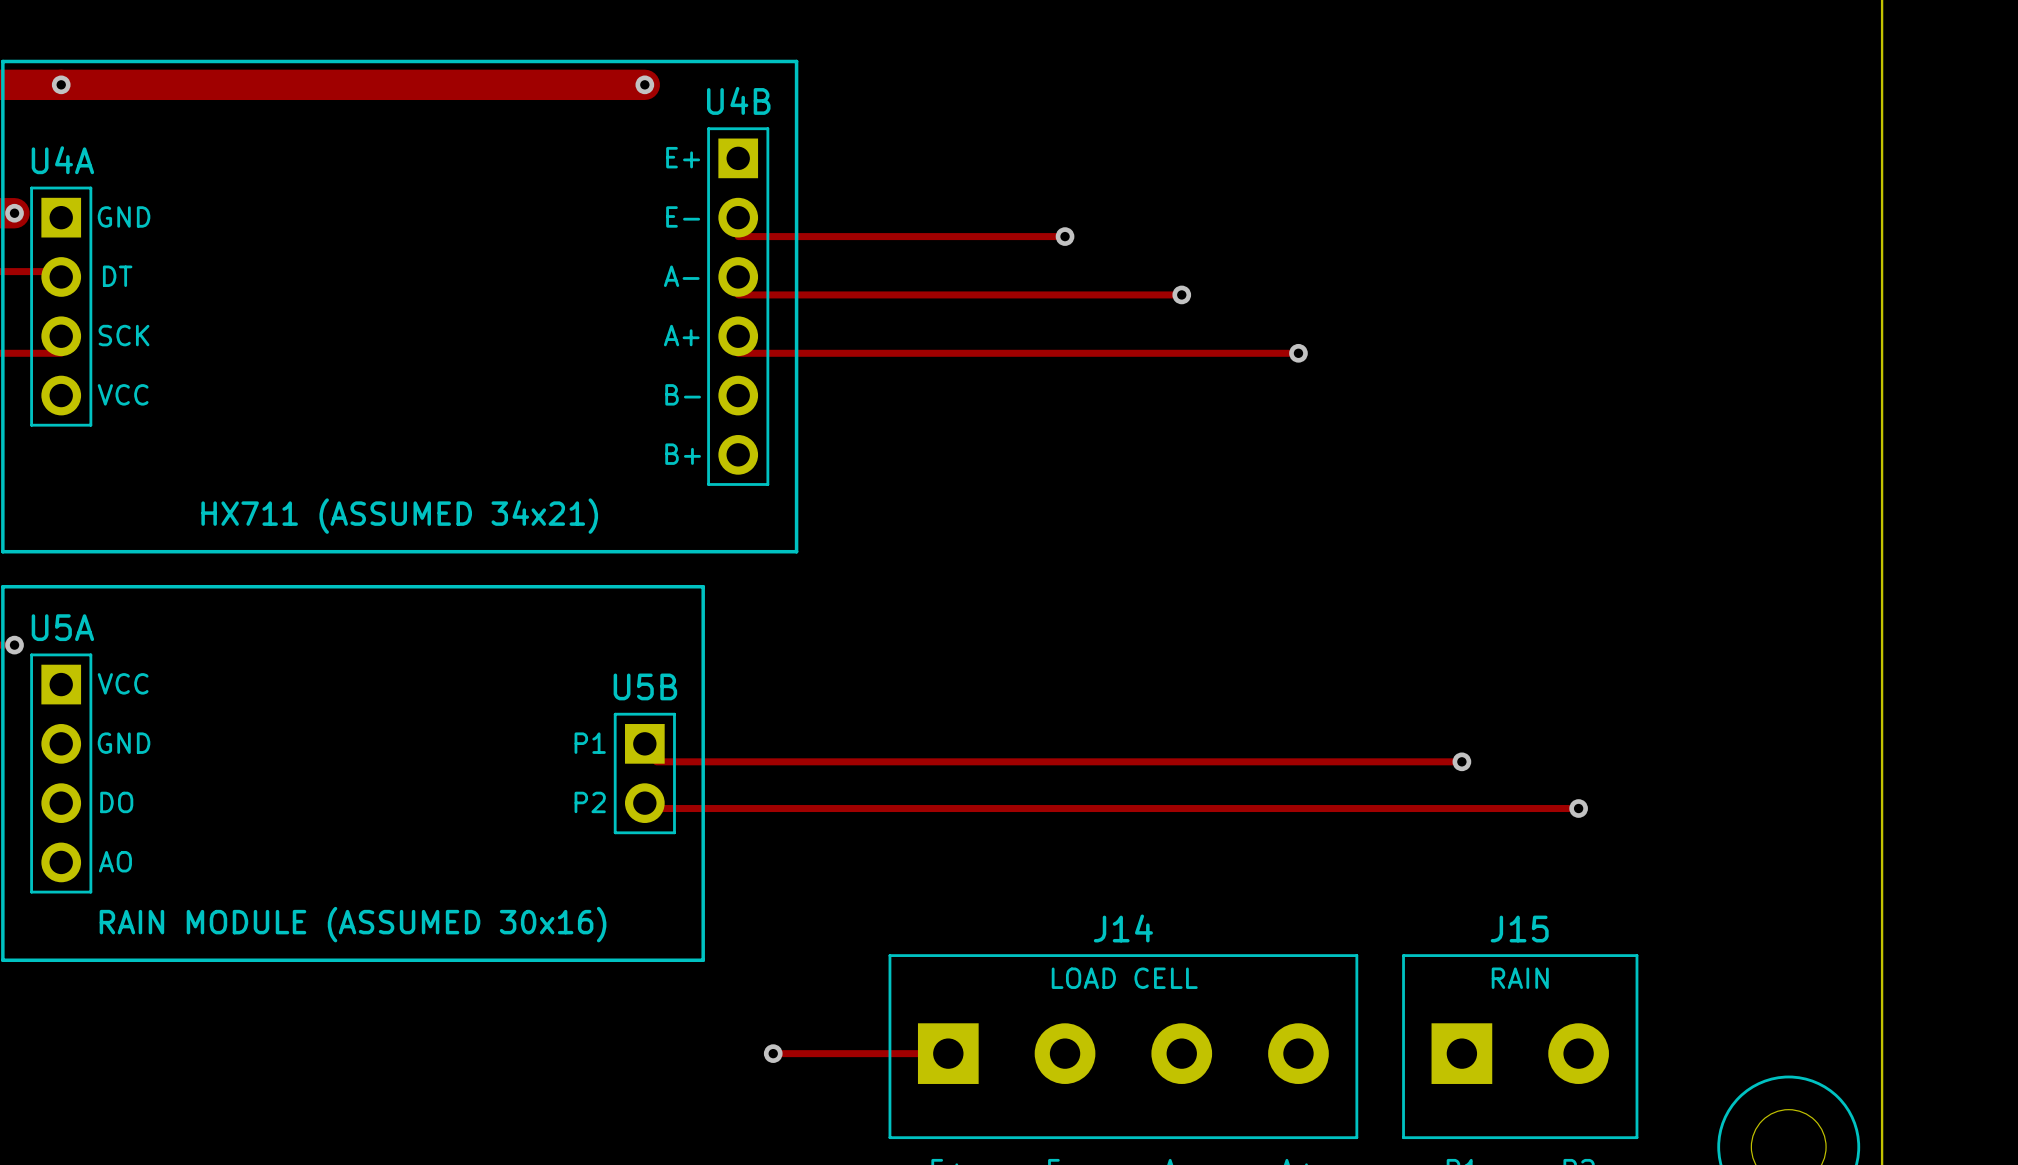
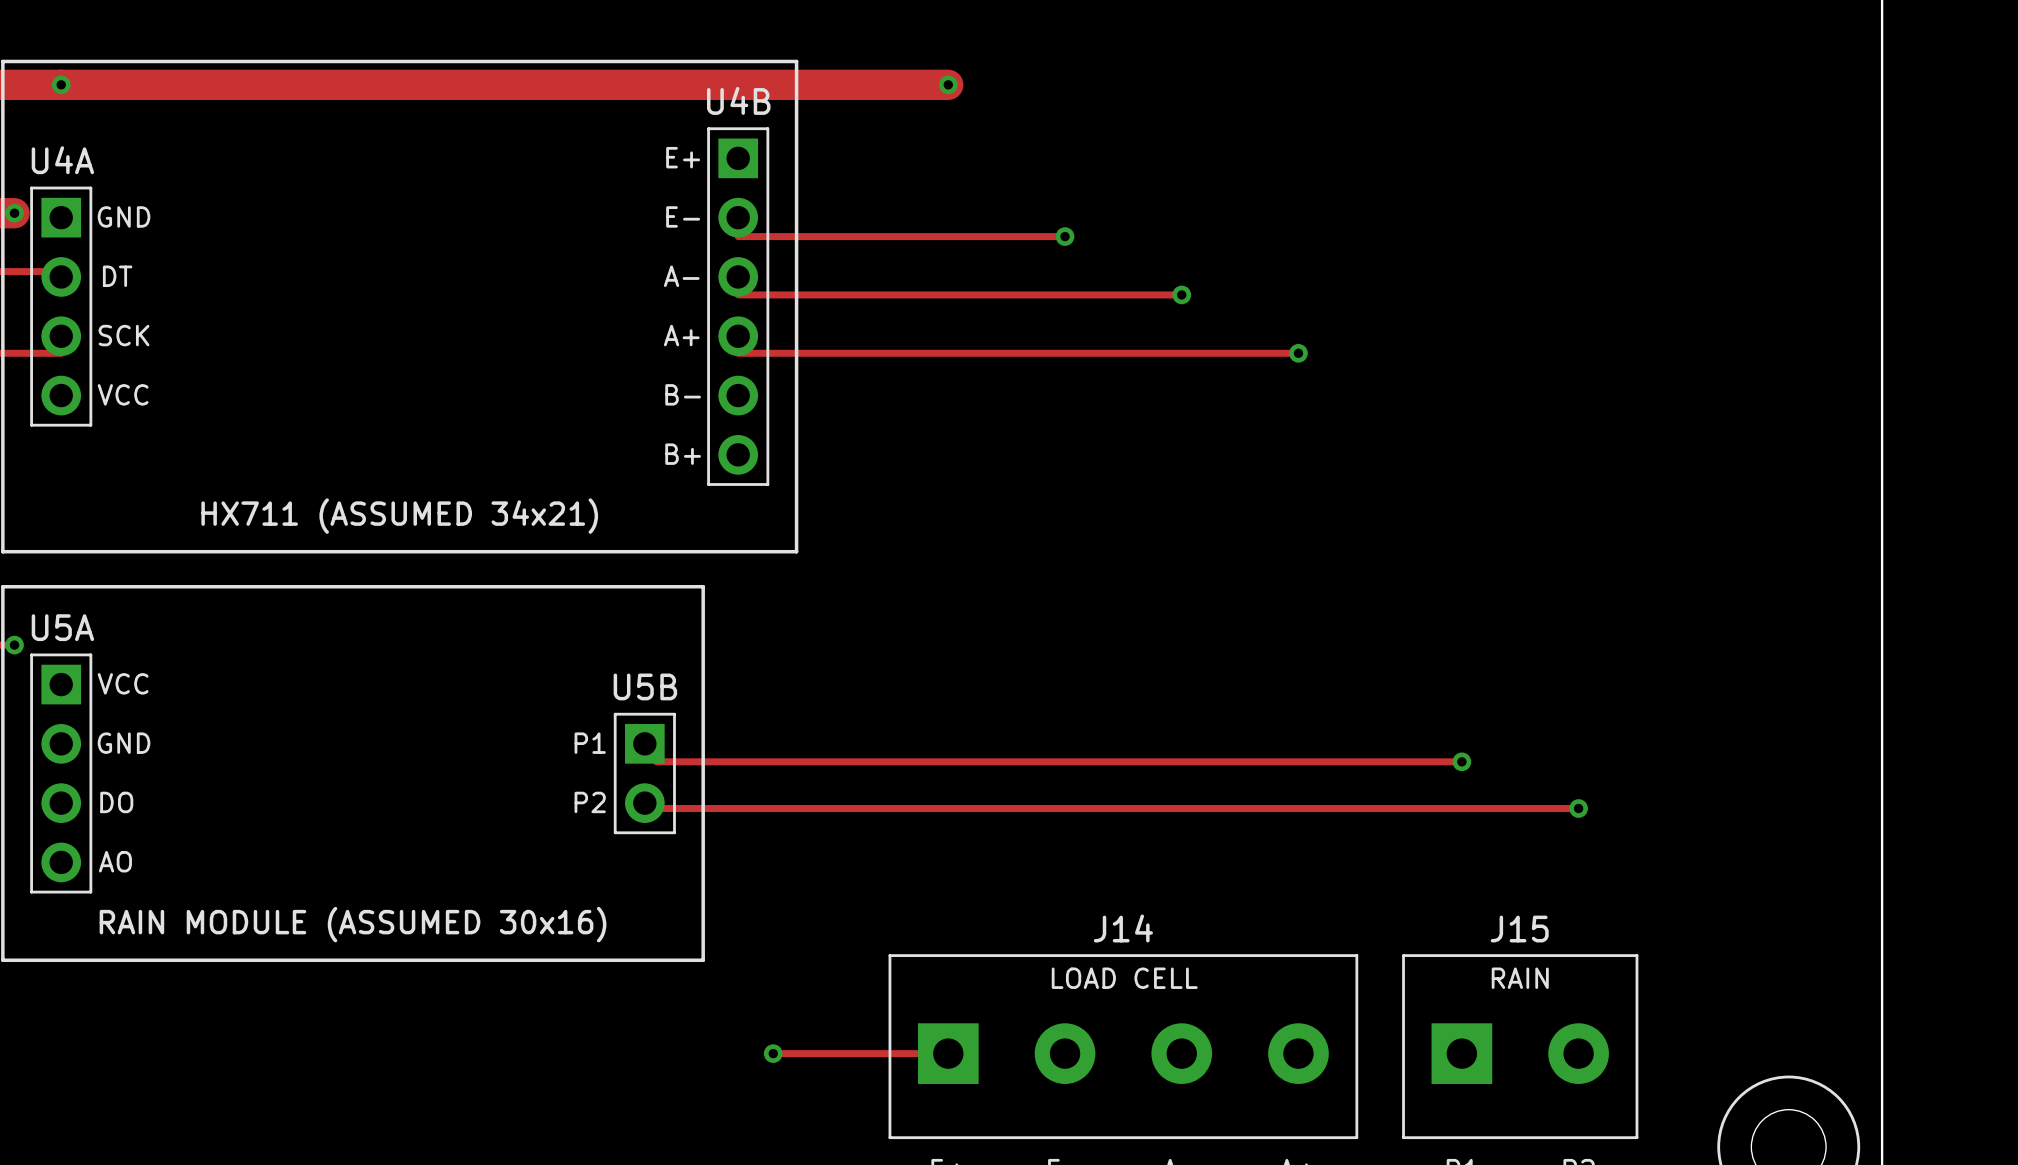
track: none -> (644, 84) (948, 84)
via: (644, 84) -> none
via: none -> (948, 84)

